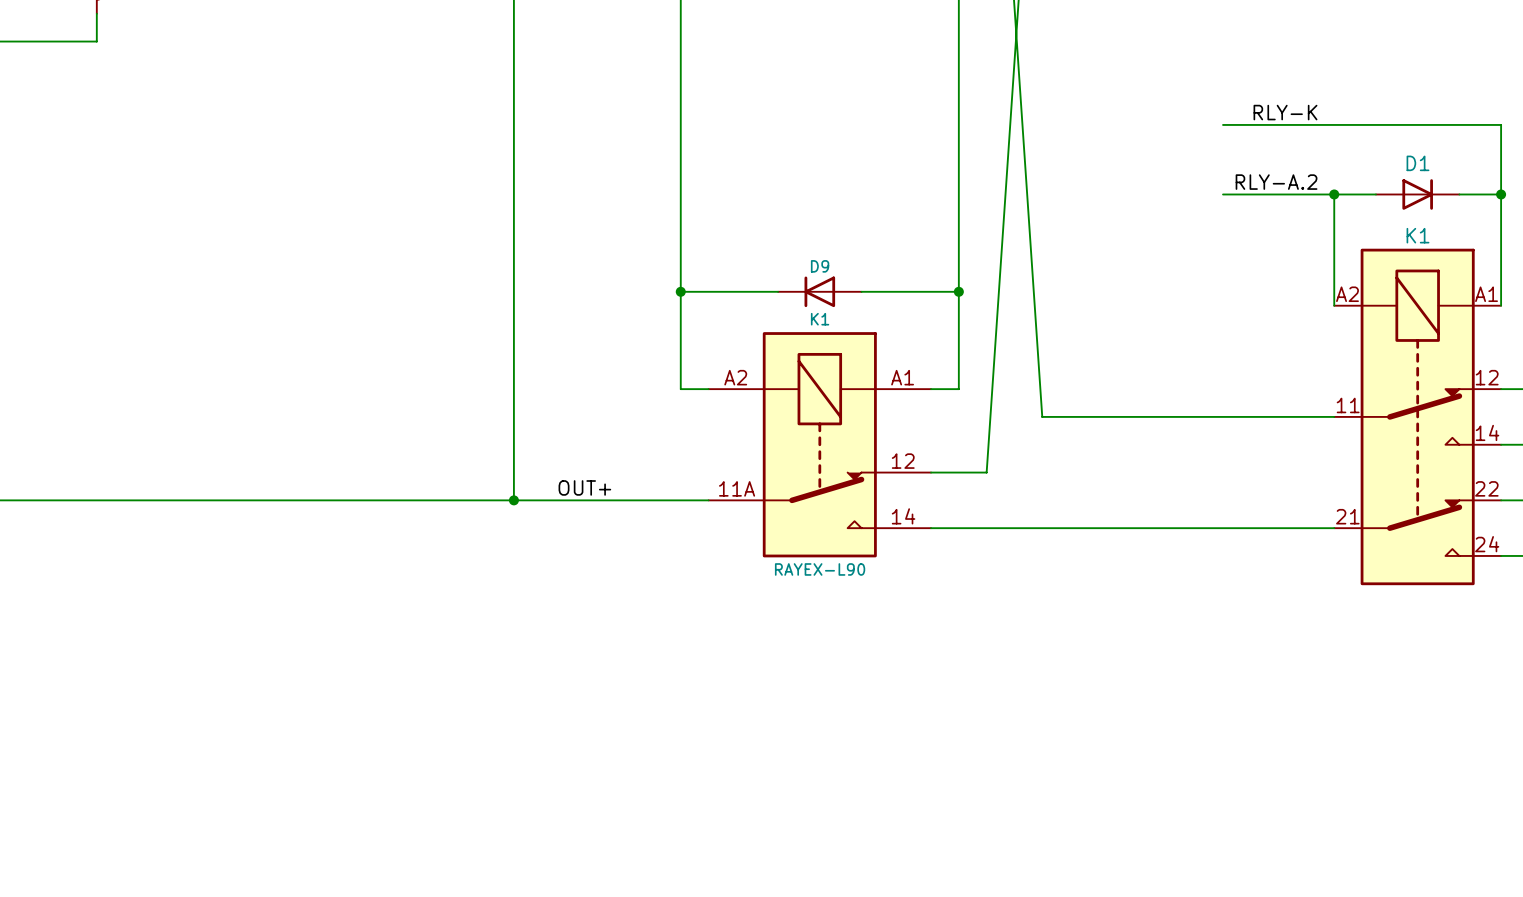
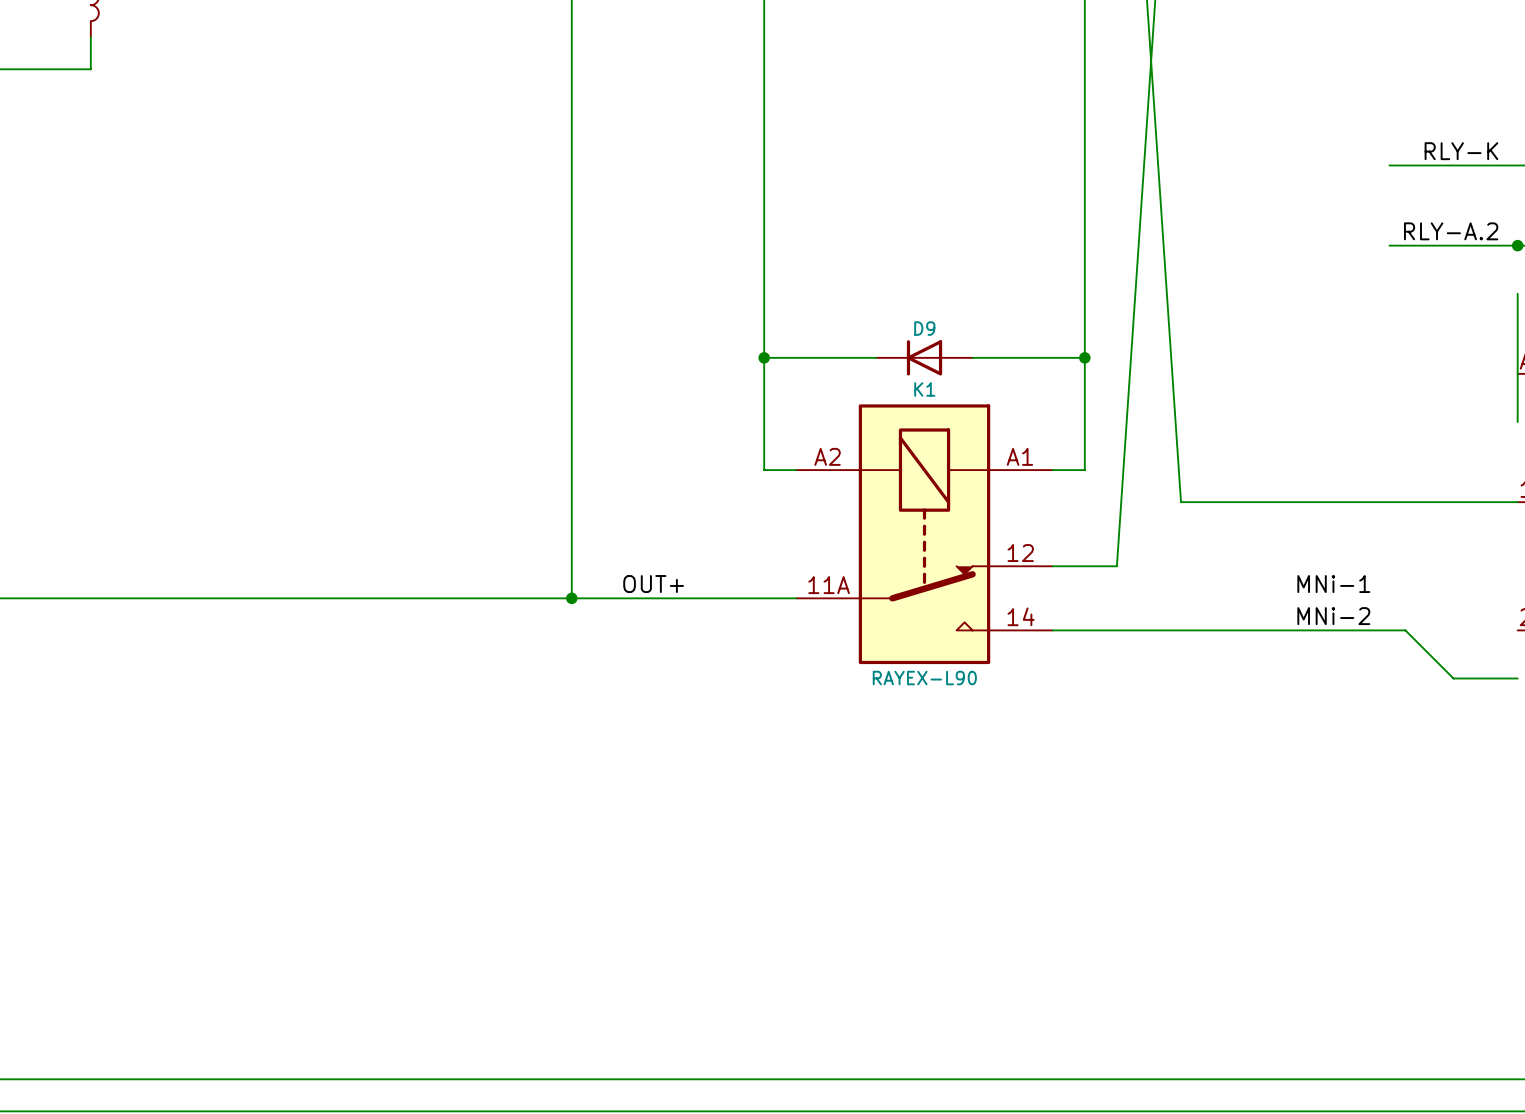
wire: (1334, 194) (1334, 236) -> (1517, 373) (1517, 421)
label: none -> MNi-1 (1333, 584)
label: none -> MNi-2 (1333, 616)
wire: (1236, 528) (1334, 528) -> (1405, 630) (1453, 678) (1517, 678)

